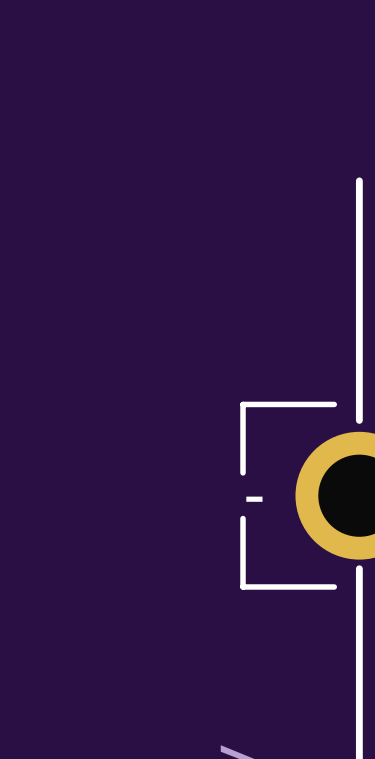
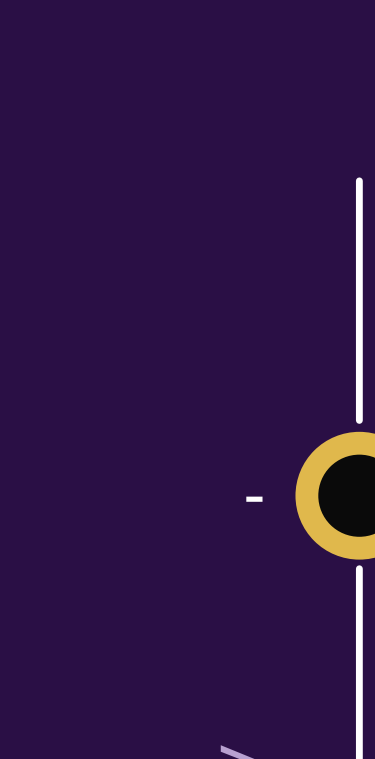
line: (334, 404) (243, 404) (243, 472) -> none
line: (243, 518) (243, 586) (334, 586) -> none

